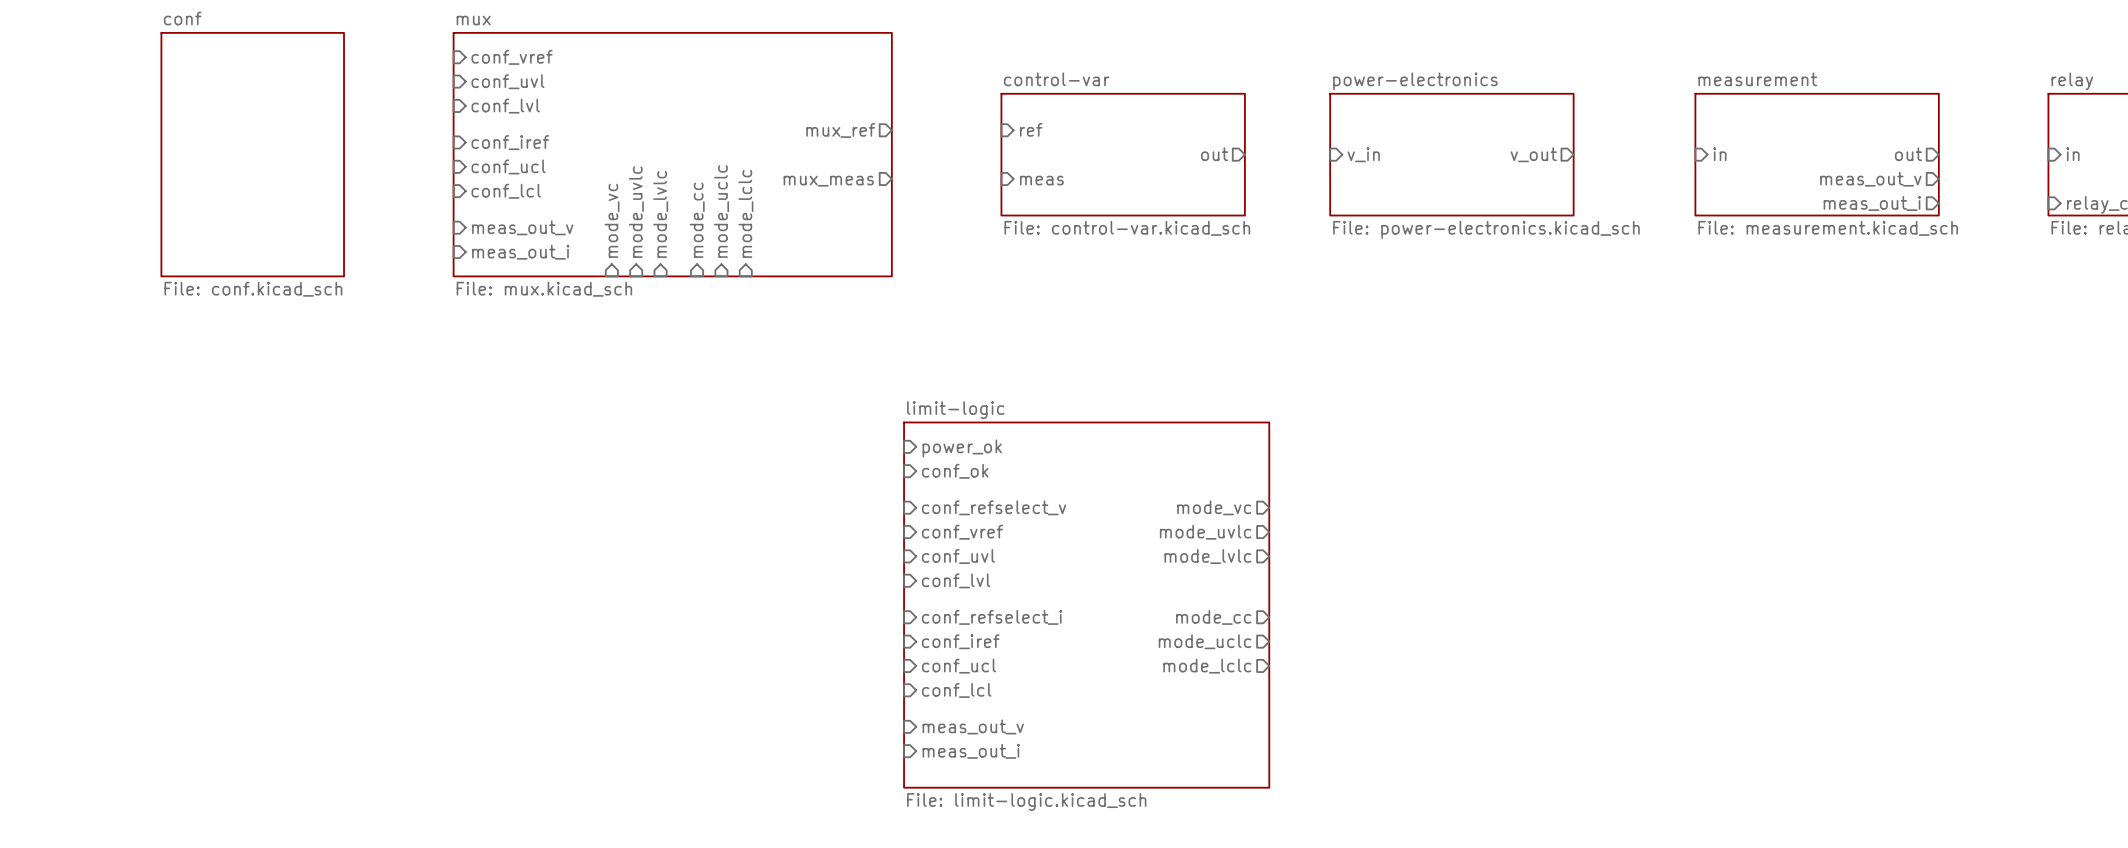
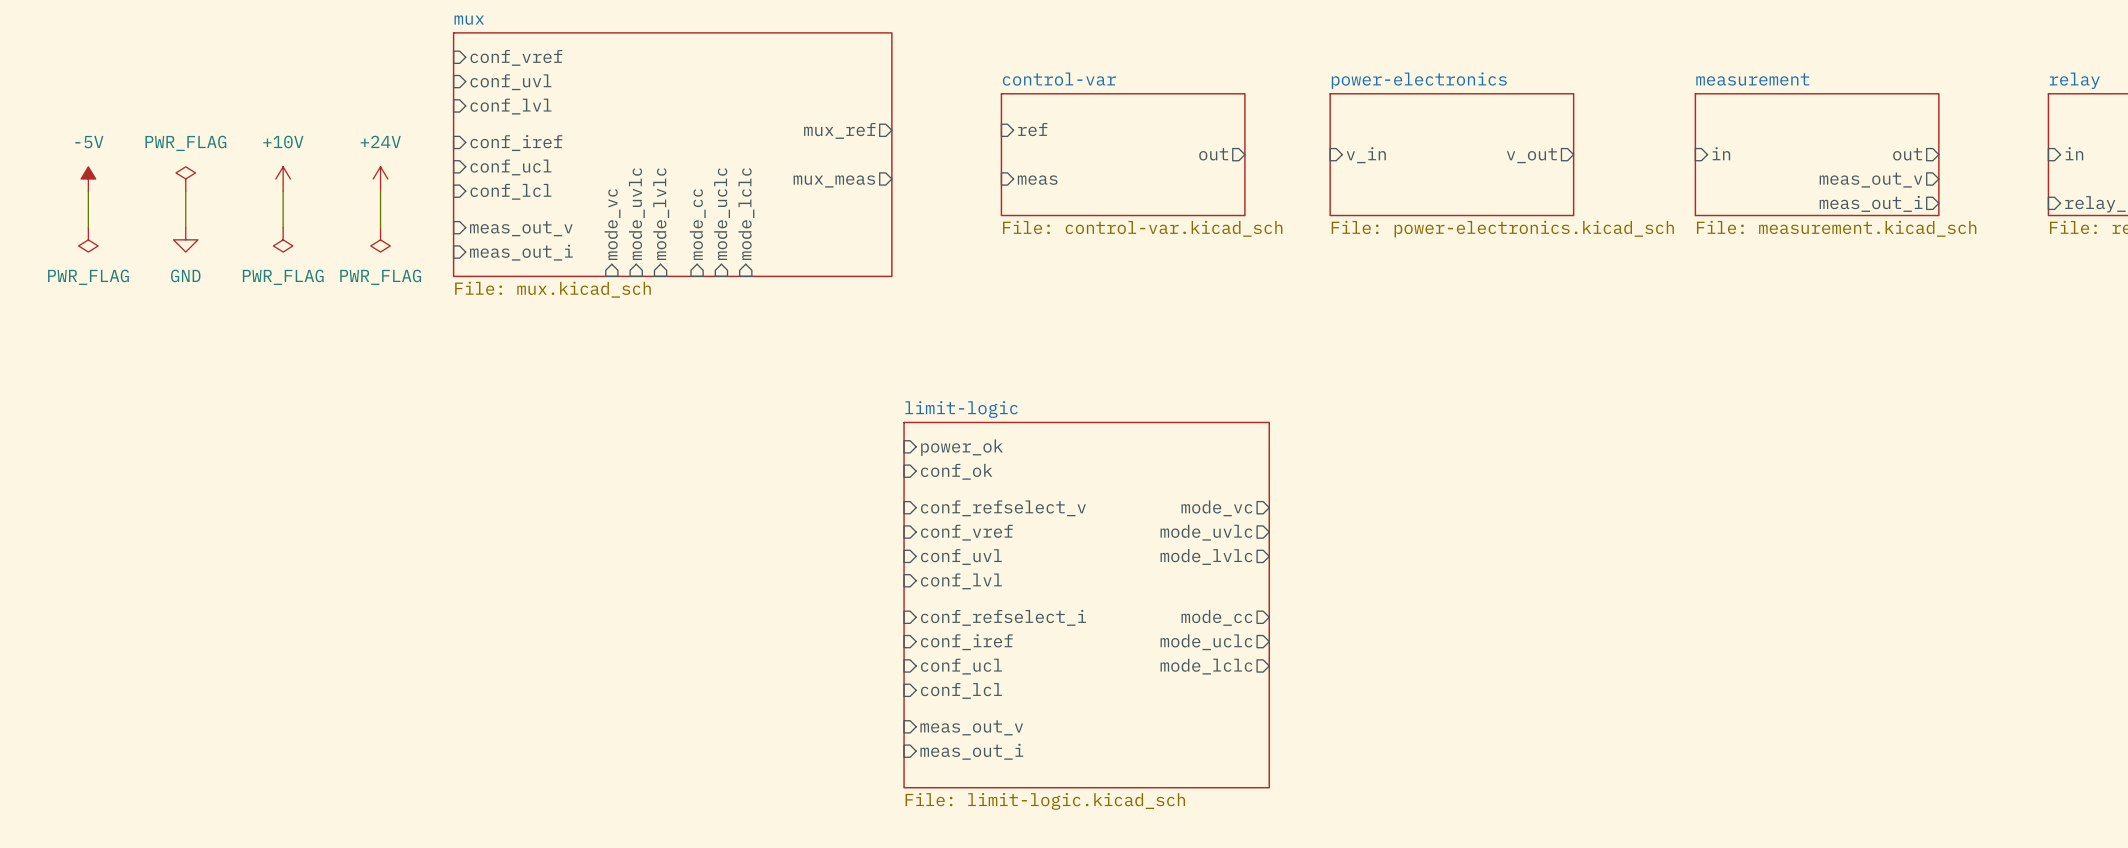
sheet conf: File: conf.kicad_sch (252, 154) -> none
power symbol: none -> -5V (88, 178)
power symbol: none -> PWR_FLAG (185, 178)
power symbol: none -> +10V (283, 178)
power symbol: none -> +24V (380, 178)
wire: none -> (88, 191) (88, 227)
wire: none -> (185, 191) (185, 227)
wire: none -> (283, 191) (283, 227)
wire: none -> (380, 191) (380, 227)
power symbol: none -> PWR_FLAG (88, 239)
power symbol: none -> GND (185, 239)
power symbol: none -> PWR_FLAG (283, 239)
power symbol: none -> PWR_FLAG (380, 239)

